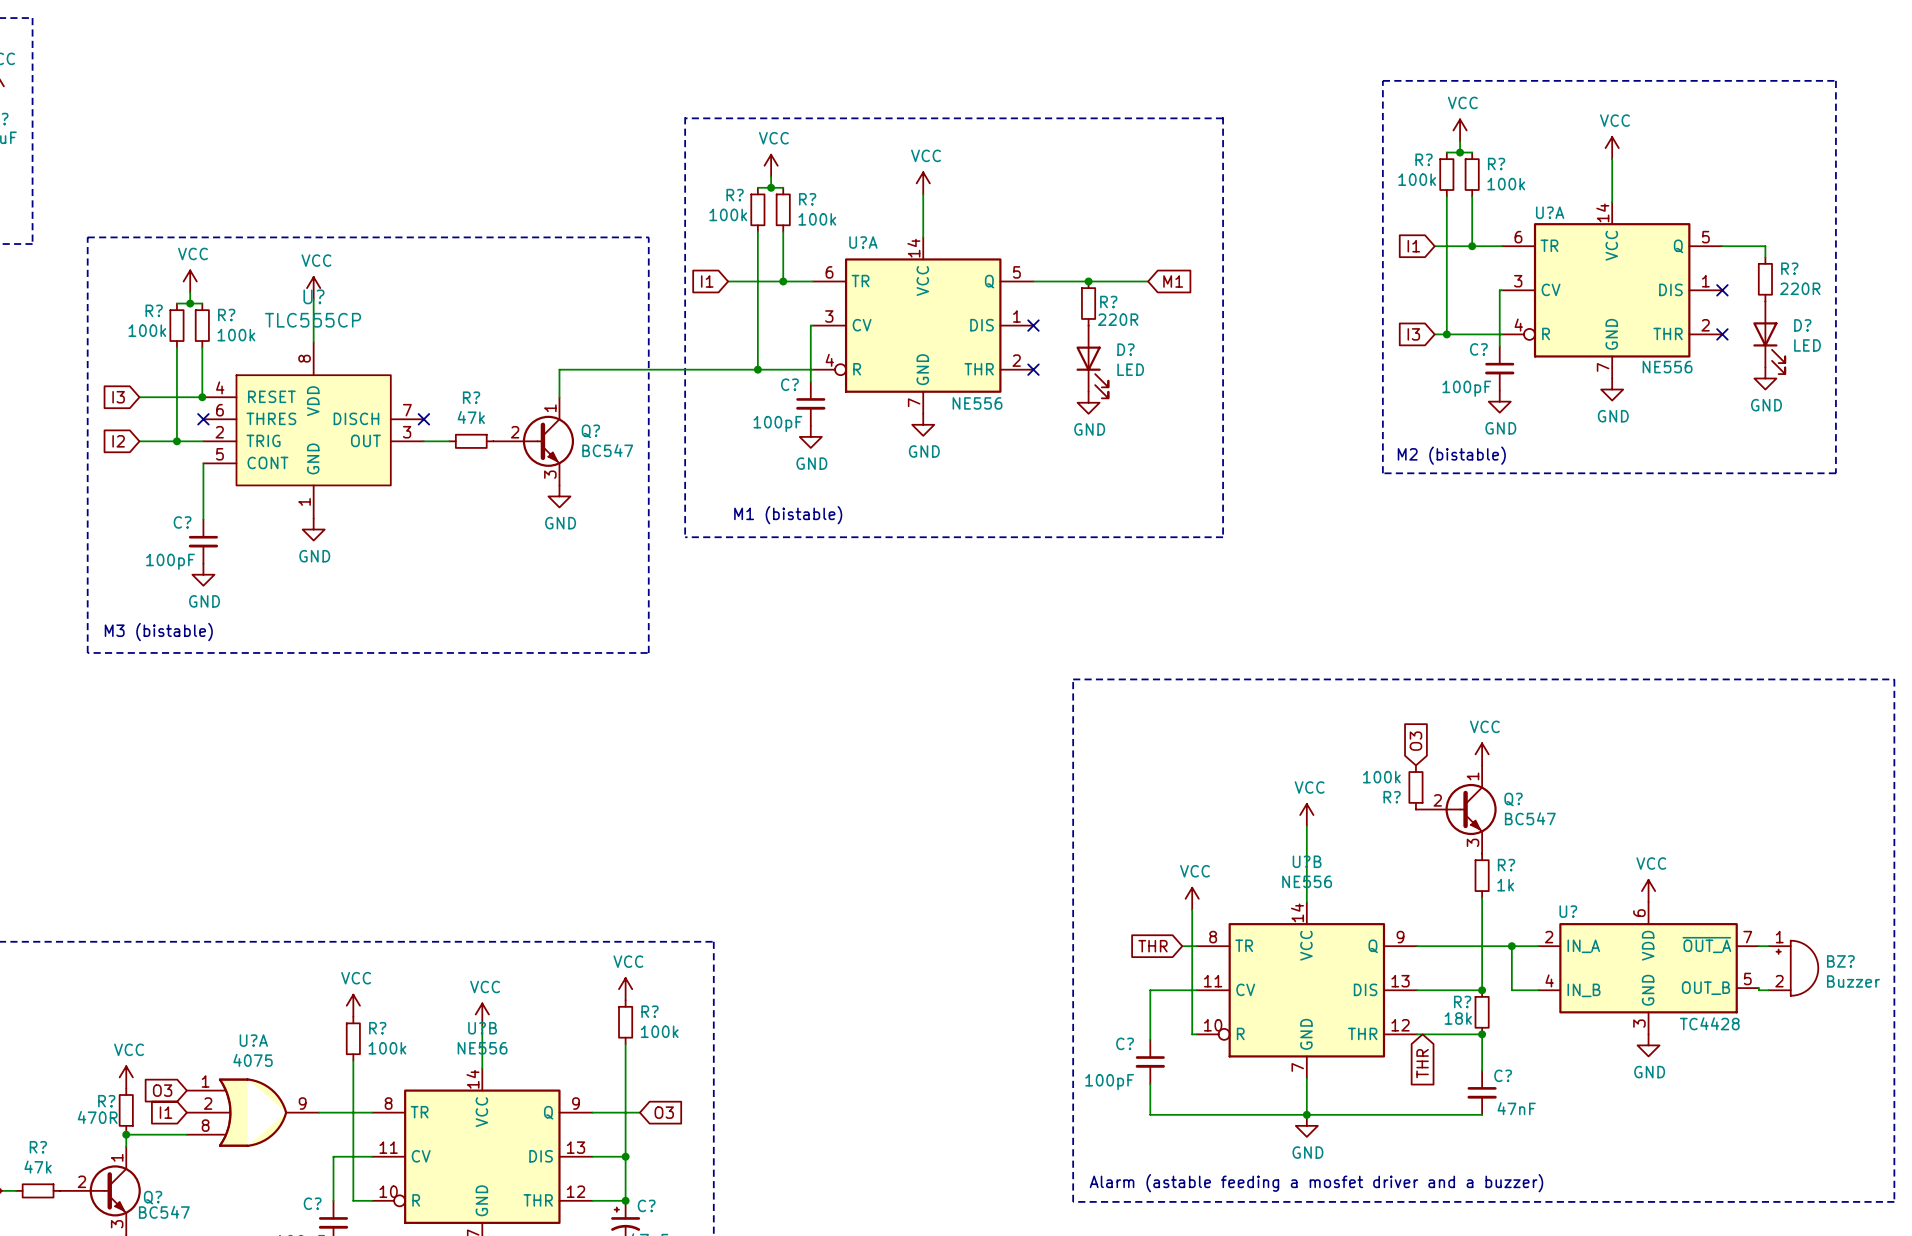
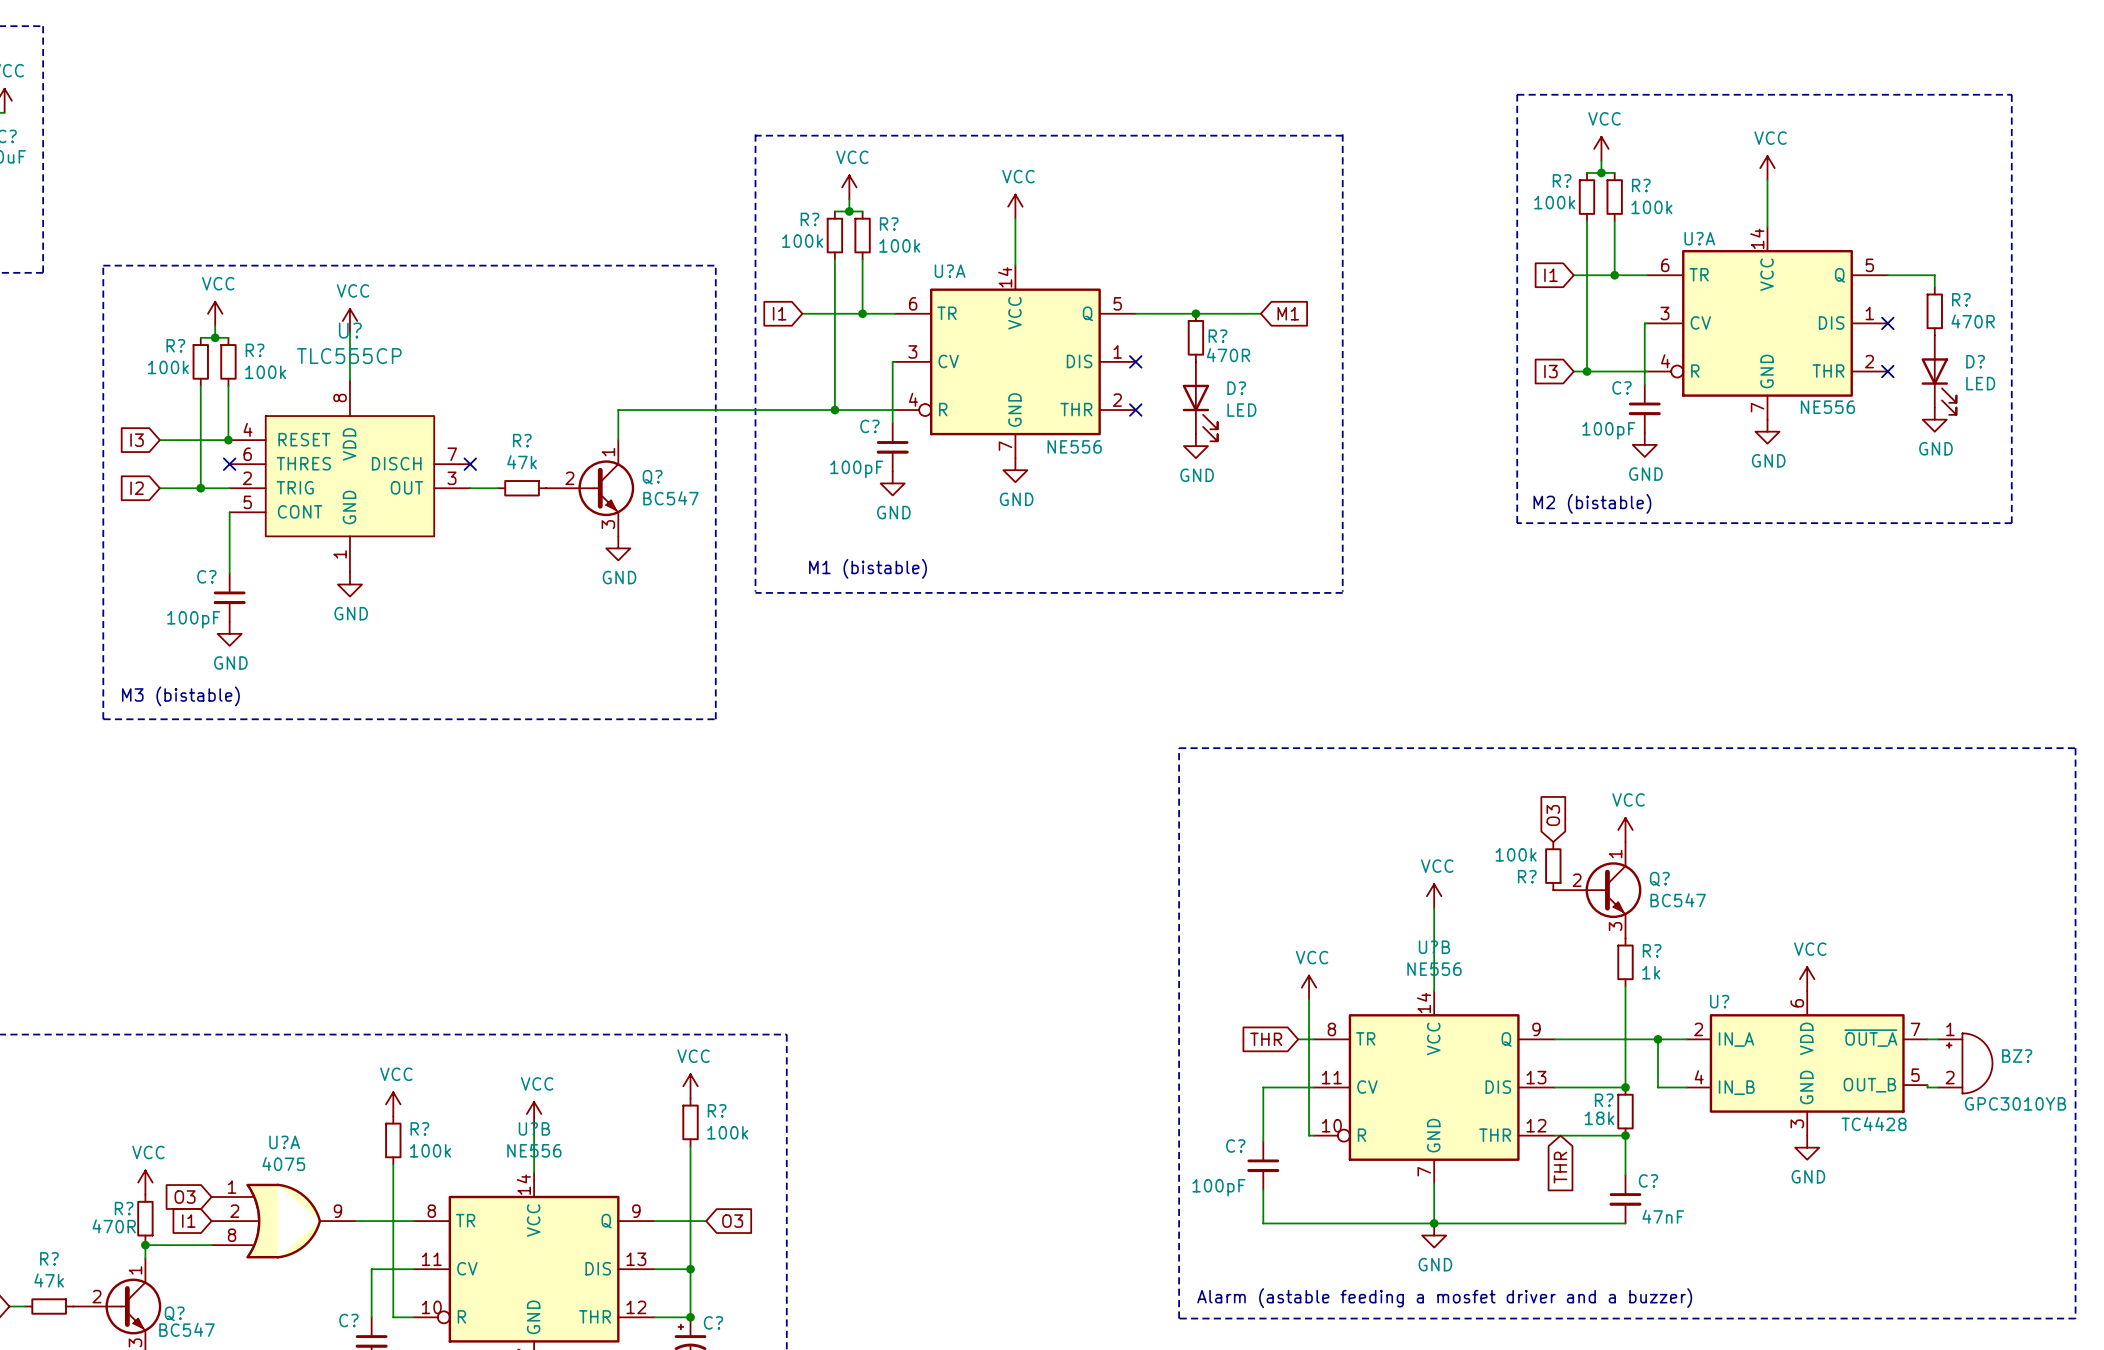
R? value: 220R (1800, 288) -> 470R (1973, 321)
R? value: 220R (1118, 319) -> 470R (1228, 355)
BZ? value: Buzzer (1853, 981) -> GPC3010YB (2015, 1103)

